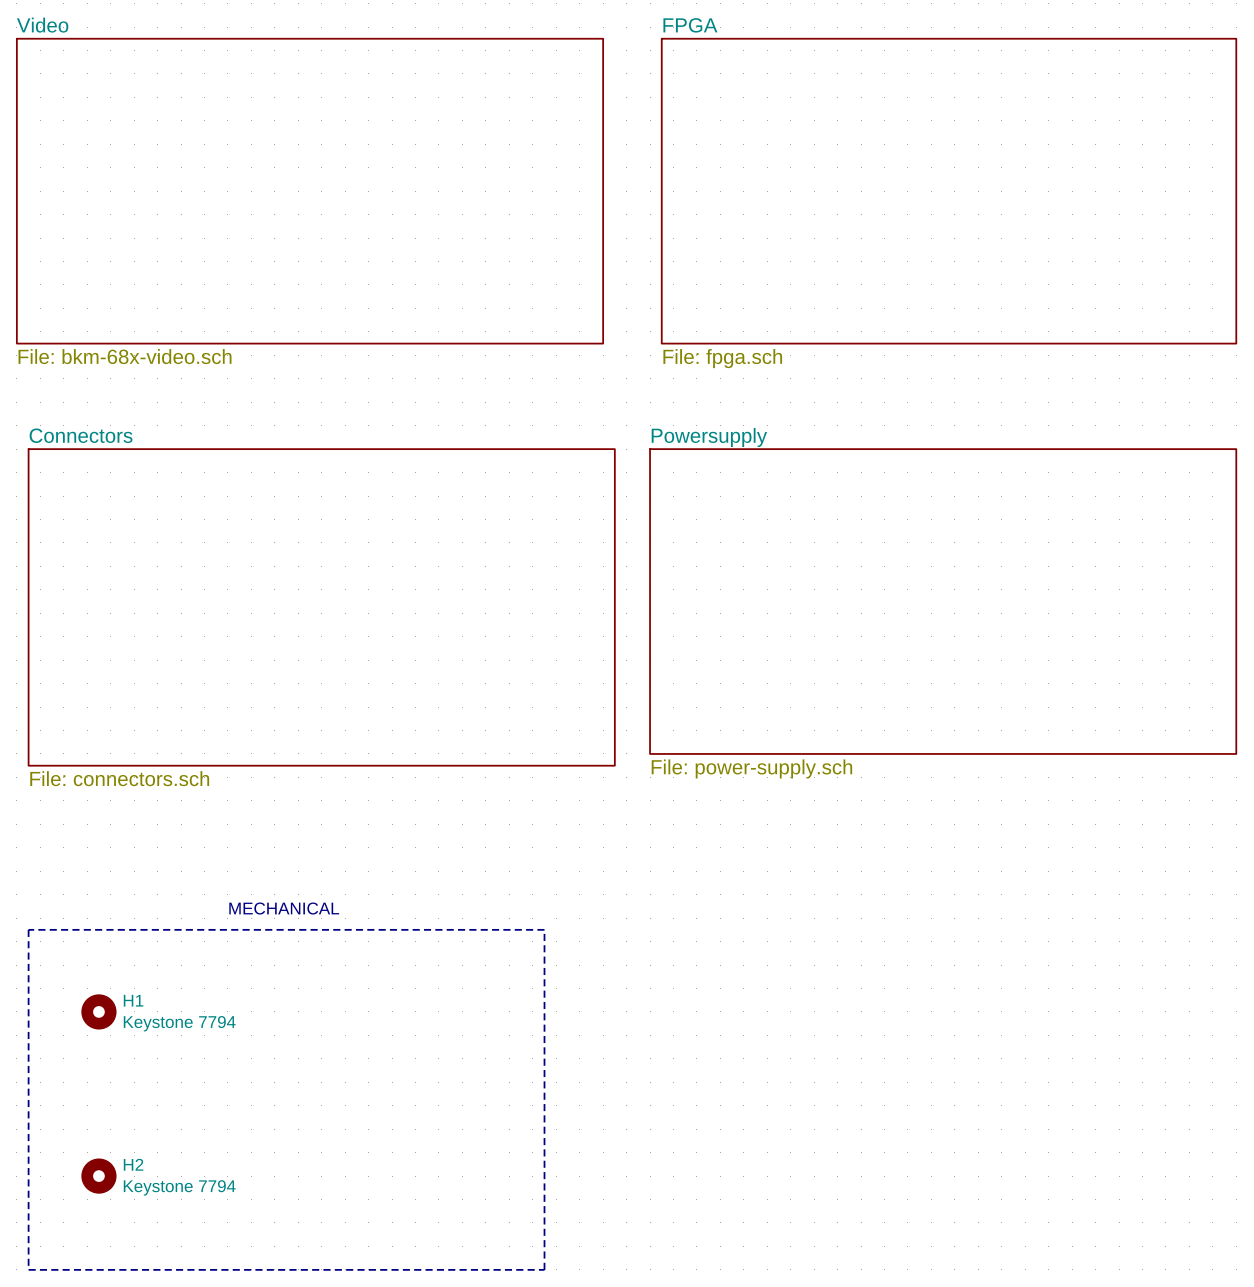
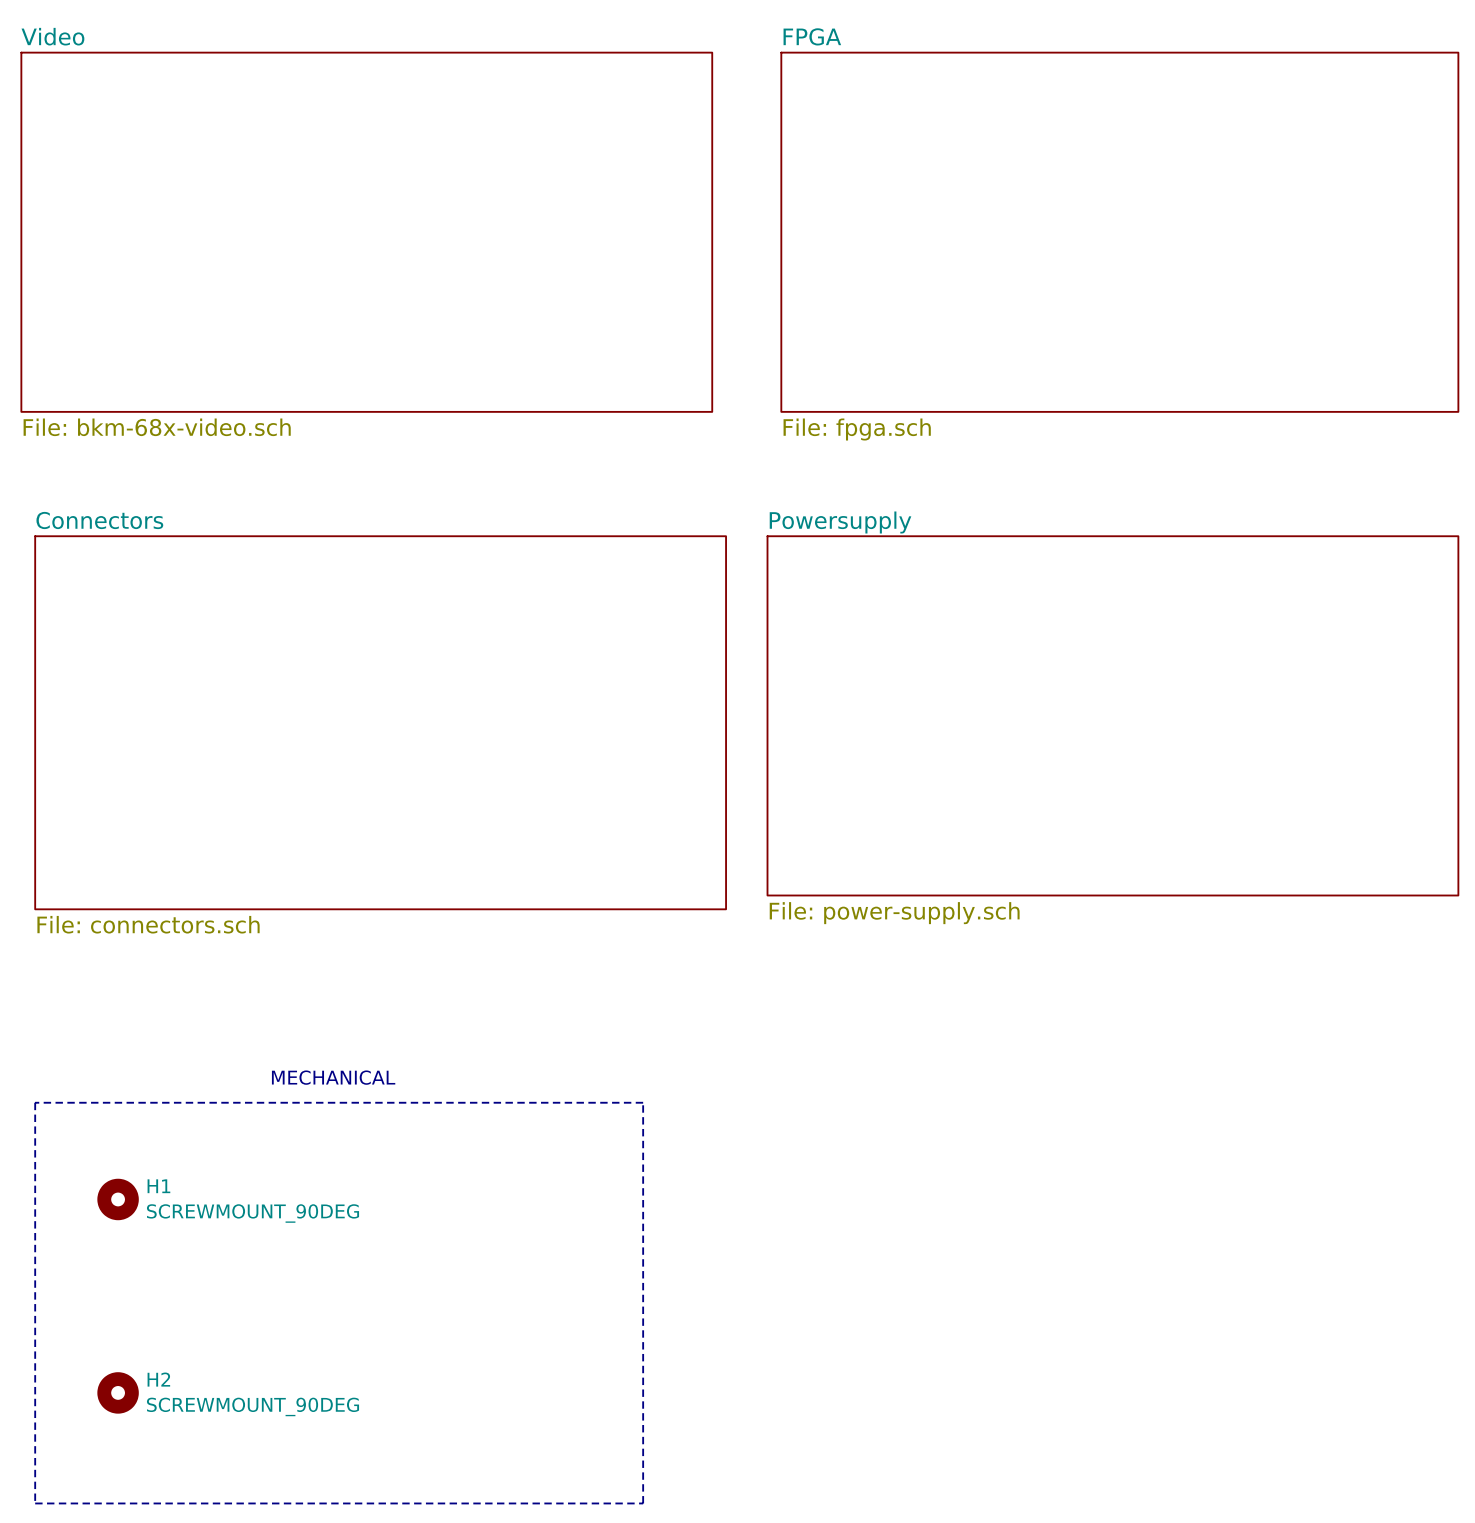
H1 value: Keystone 7794 (179, 1023) -> SCREWMOUNT_90DEG (253, 1213)
H2 value: Keystone 7794 (179, 1187) -> SCREWMOUNT_90DEG (253, 1406)

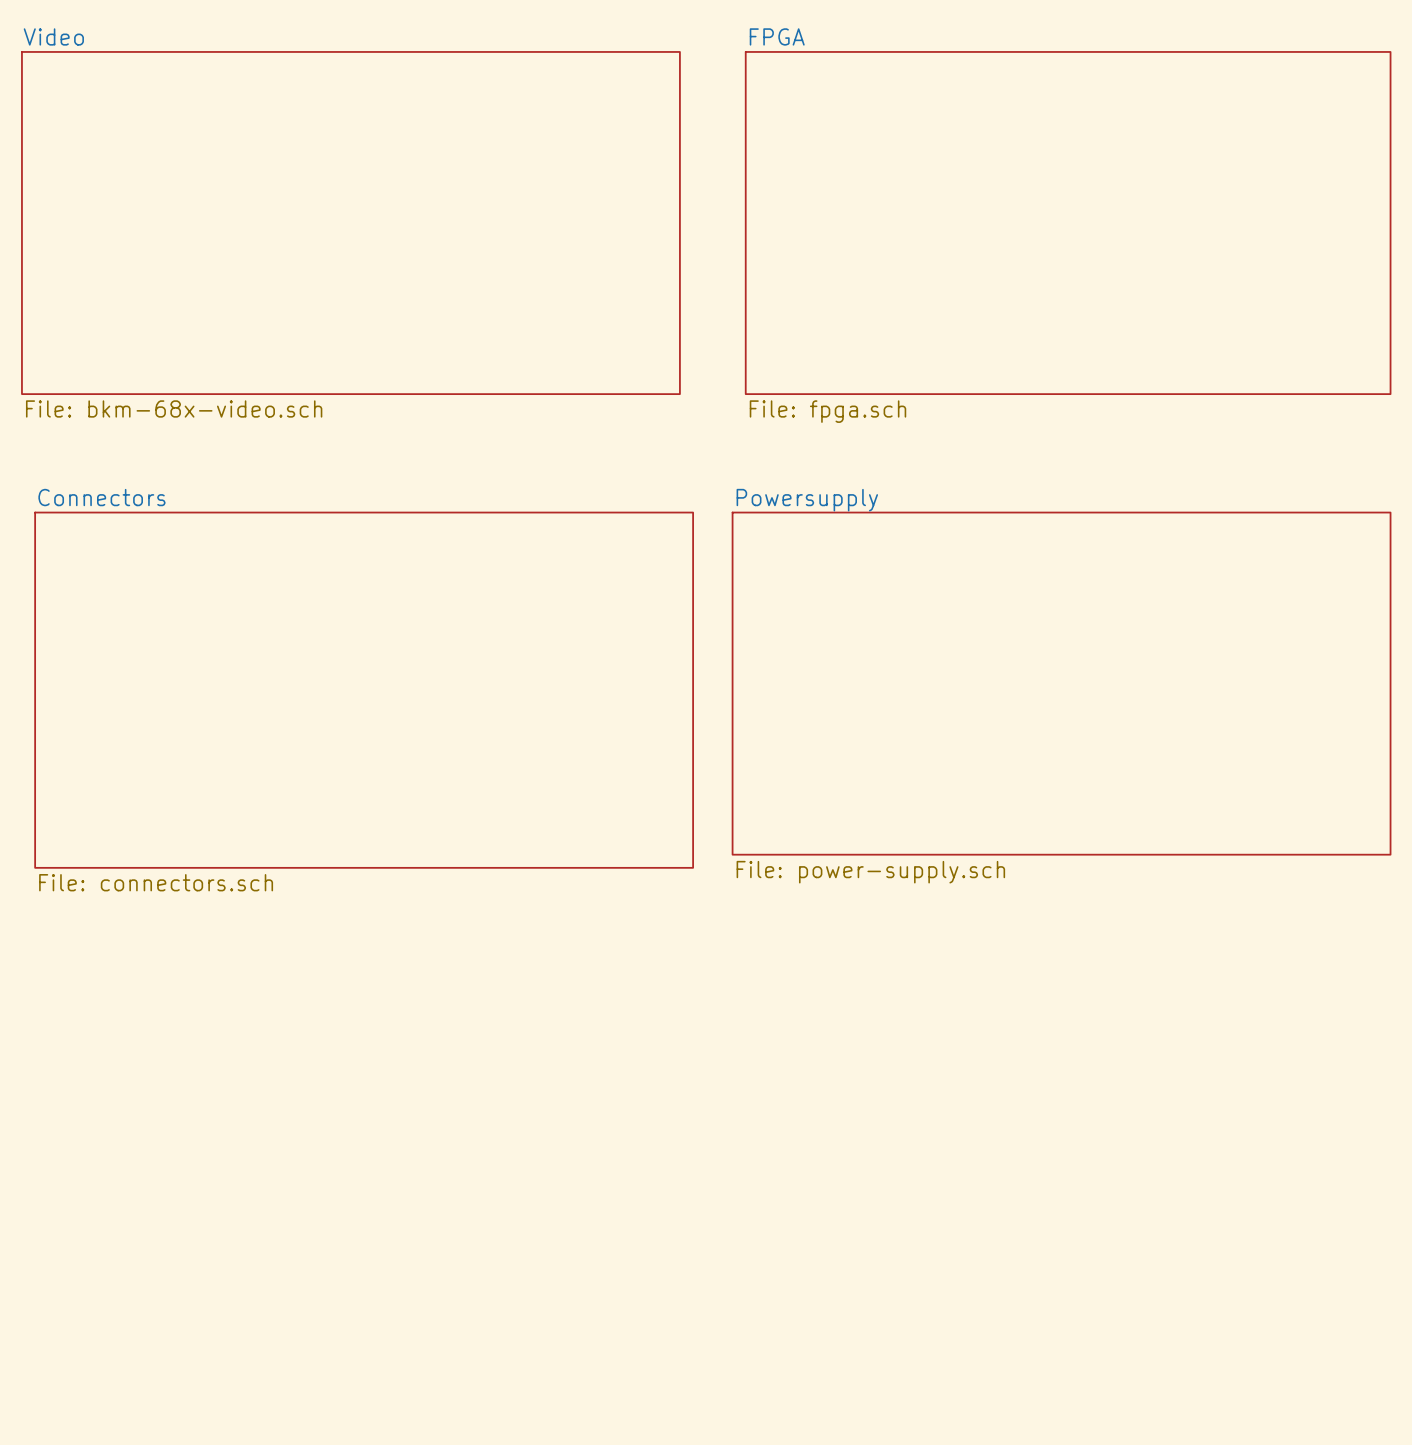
text: MECHANICAL (333, 1077) -> none
line: (35, 1102) (643, 1102) (643, 1503) (35, 1503) (35, 1102) -> none
H1: SCREWMOUNT_90DEG (118, 1199) -> none
H2: SCREWMOUNT_90DEG (118, 1392) -> none

